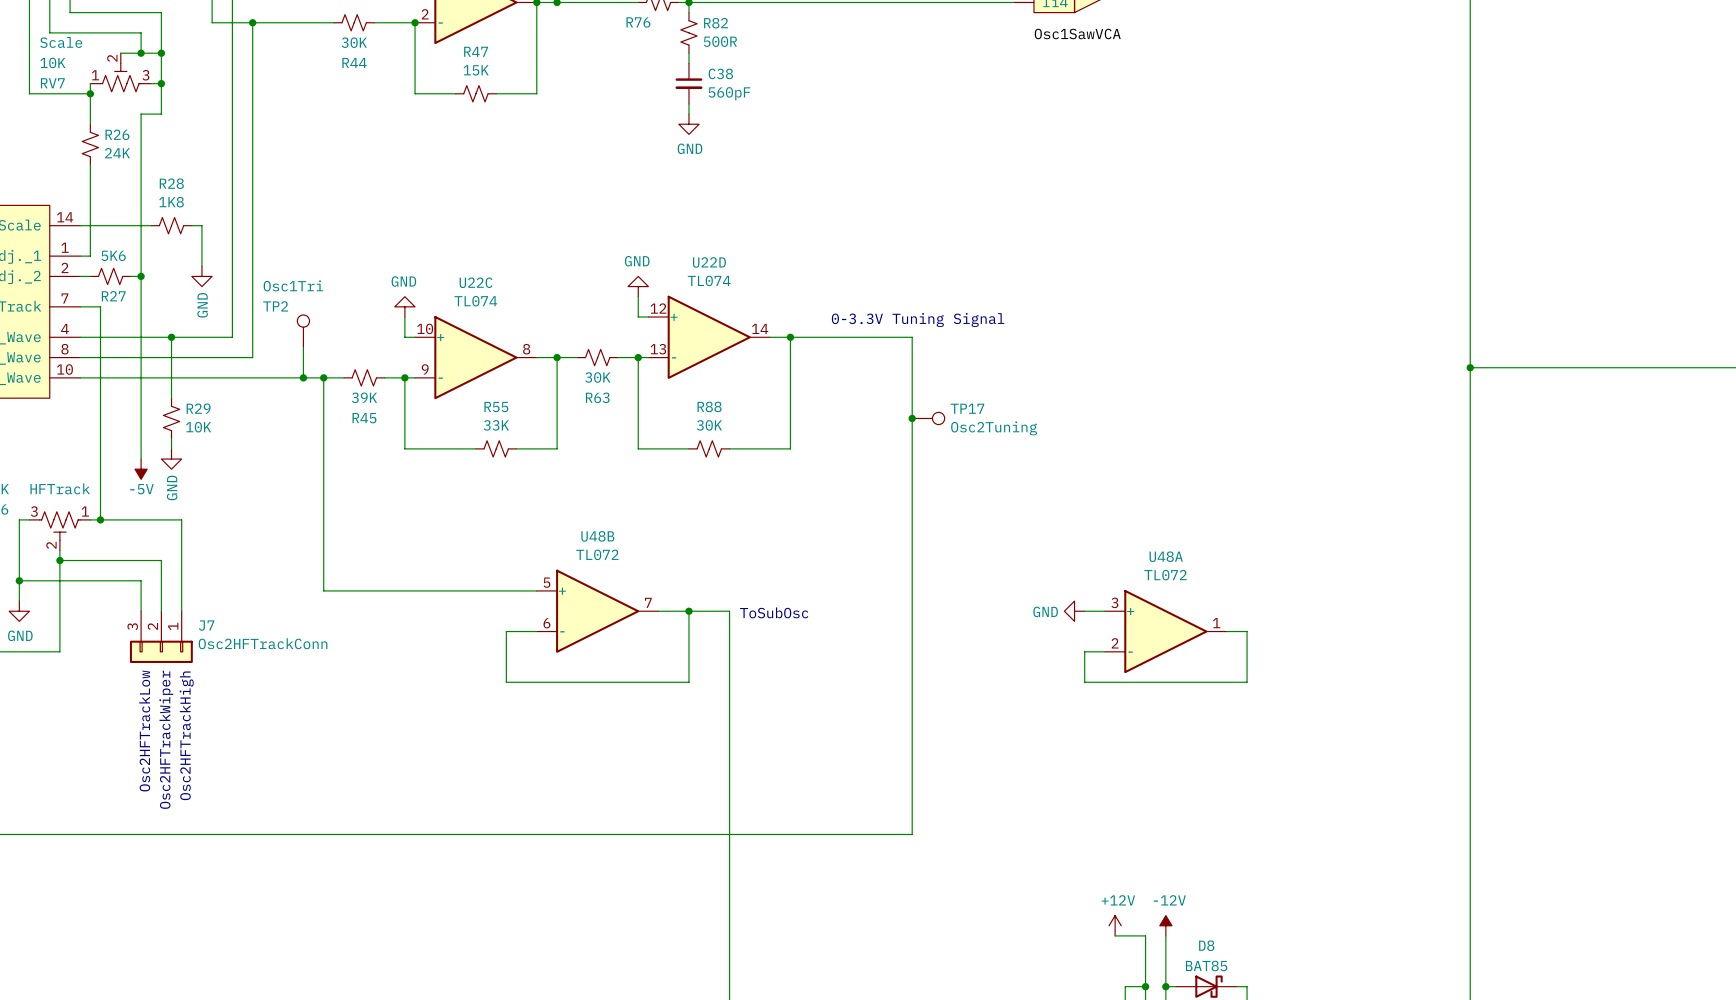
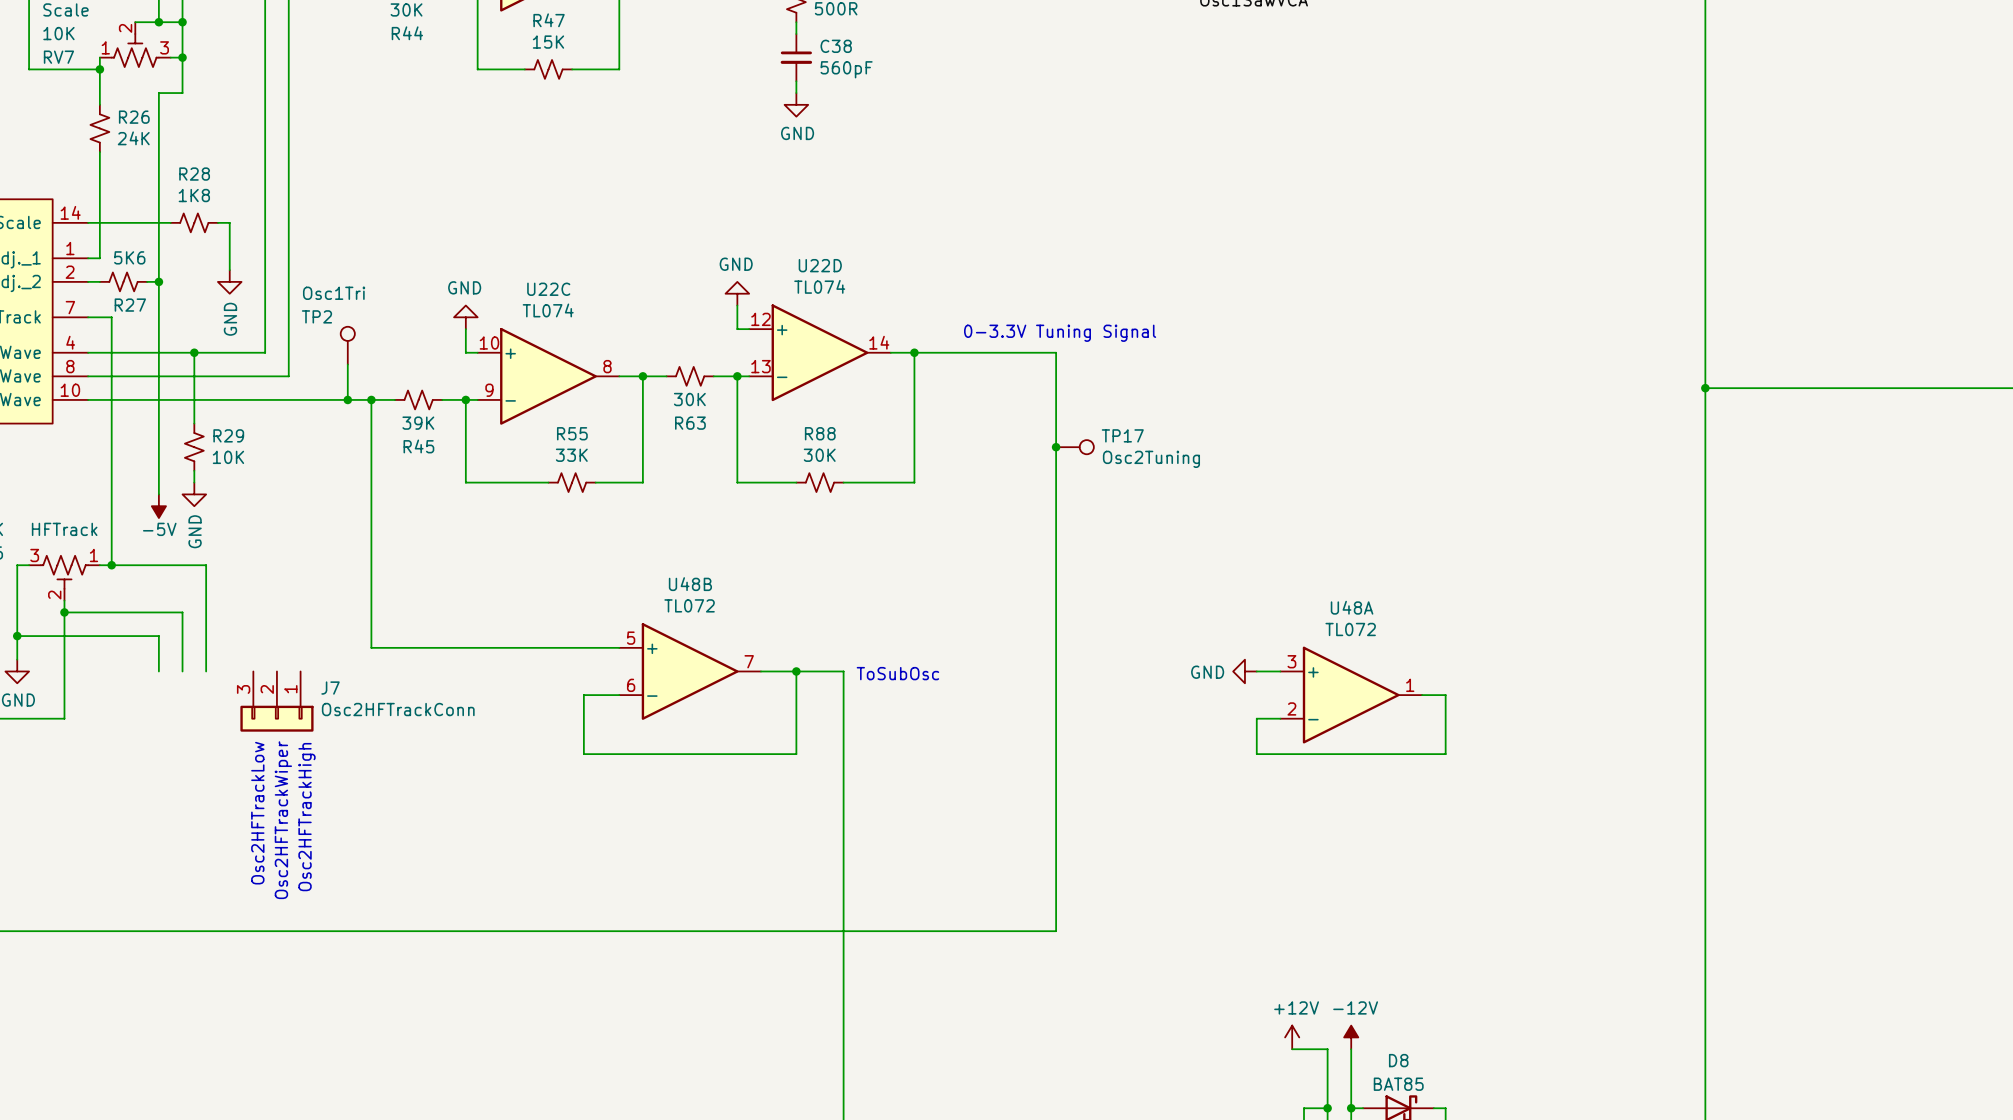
J7 position: (161, 637) -> (276, 701)
text position: Osc2HFTrackLow (144, 730) -> Osc2HFTrackLow (257, 813)
text position: Osc2HFTrackHigh (186, 735) -> Osc2HFTrackHigh (307, 817)
text position: Osc2HFTrackWiper (166, 739) -> Osc2HFTrackWiper (283, 820)

